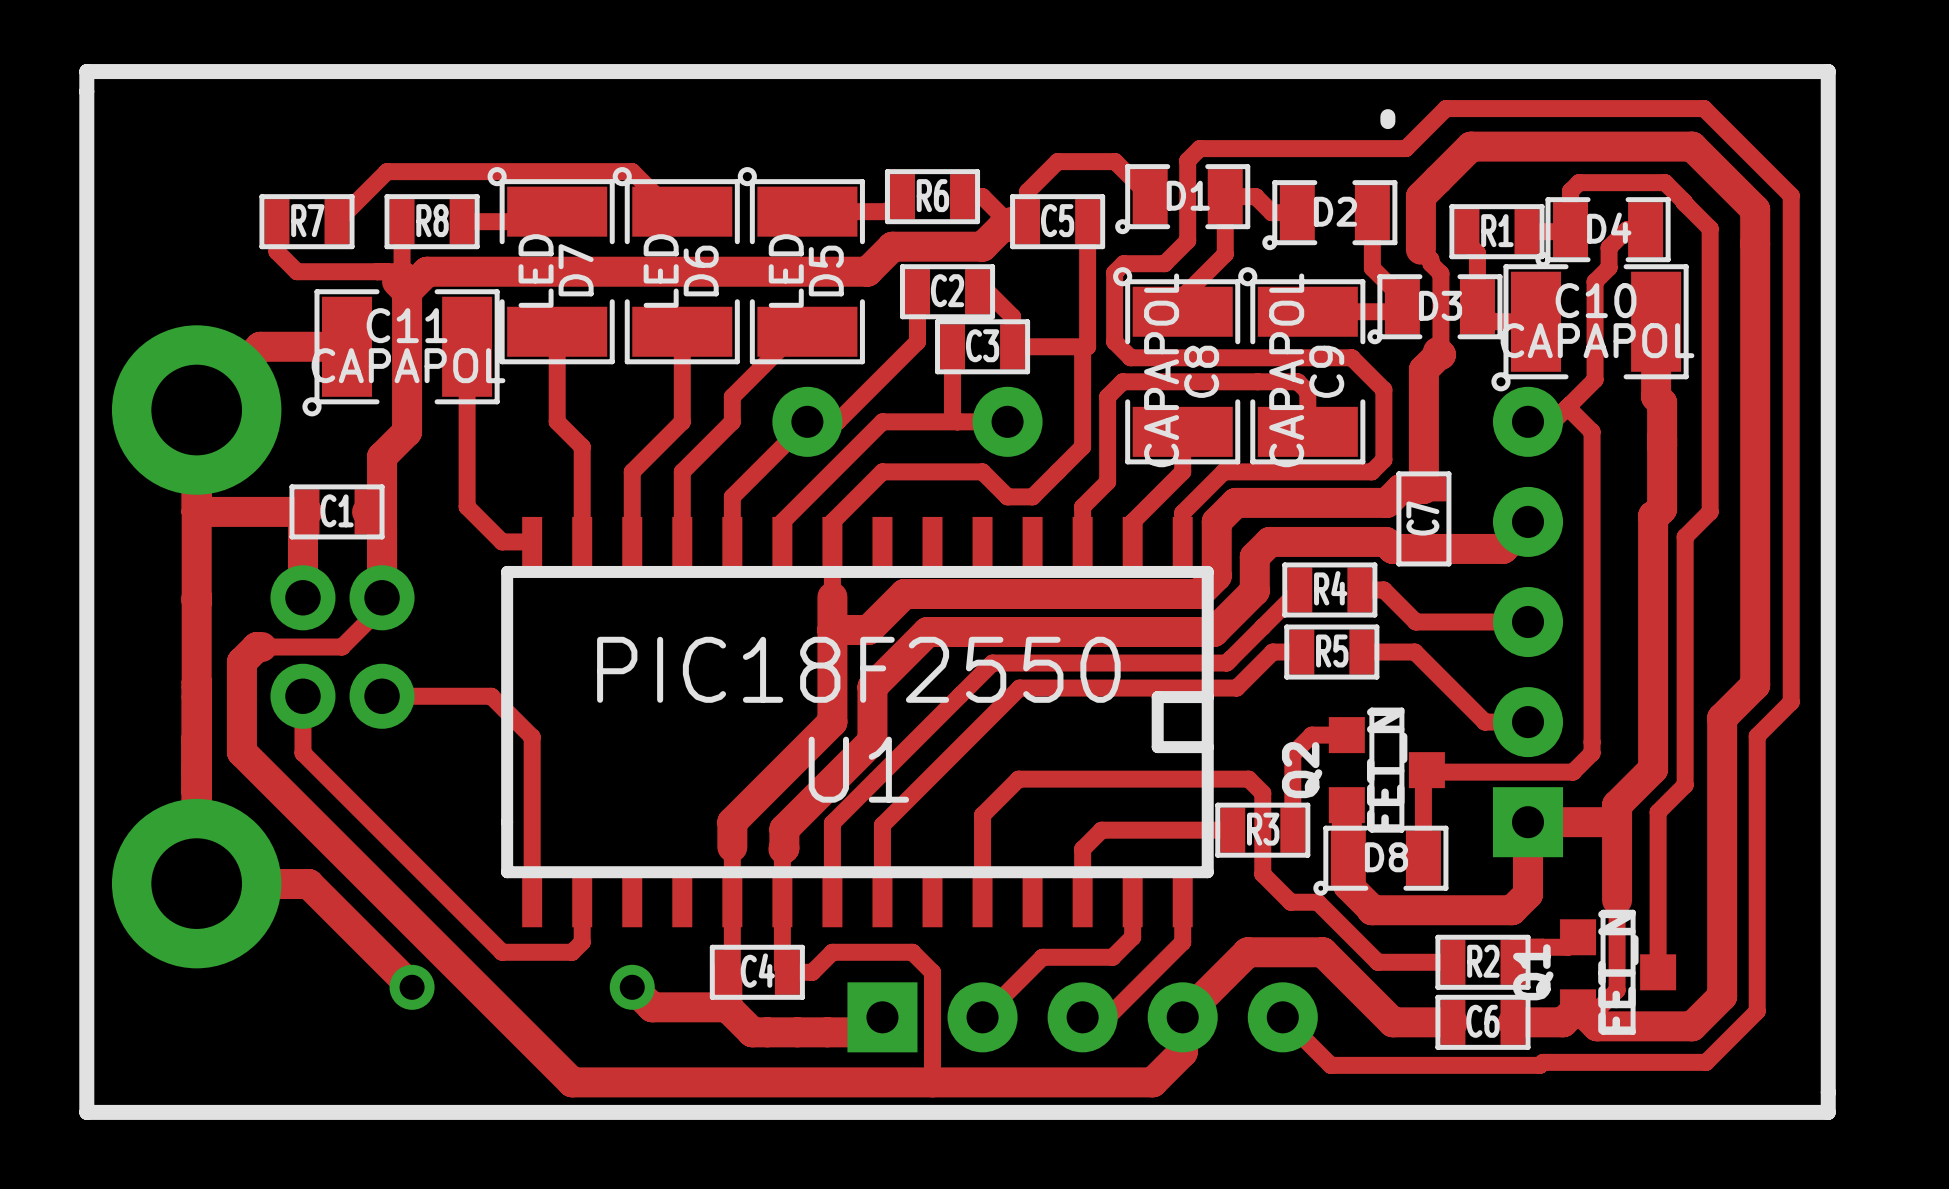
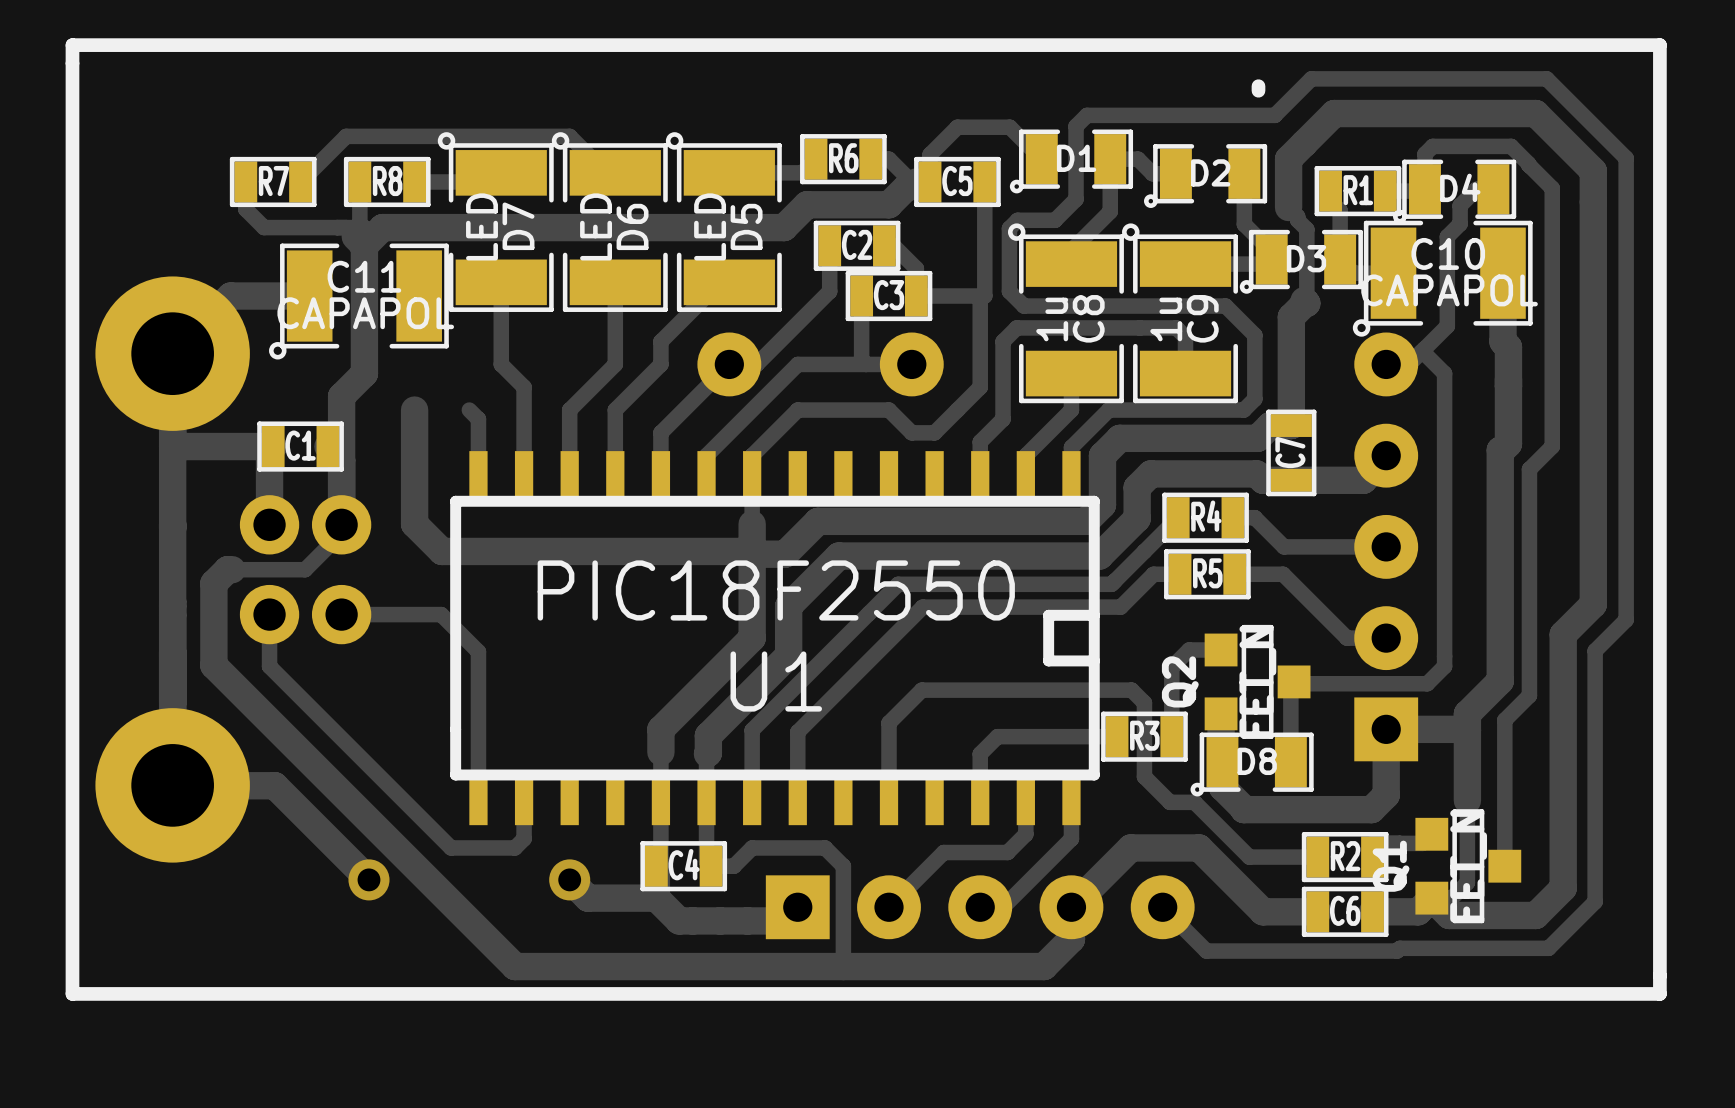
track: (467, 346) (467, 506) (502, 541) (532, 541) -> (469, 410) (478, 419) (478, 473)
C8 value: CAPAPOL (1161, 370) -> 1u (1052, 319)
C9 value: CAPAPOL (1286, 370) -> 1u (1166, 319)
track: none -> (414, 410) (414, 524) (441, 551) (752, 551) (756, 556) (752, 556)

